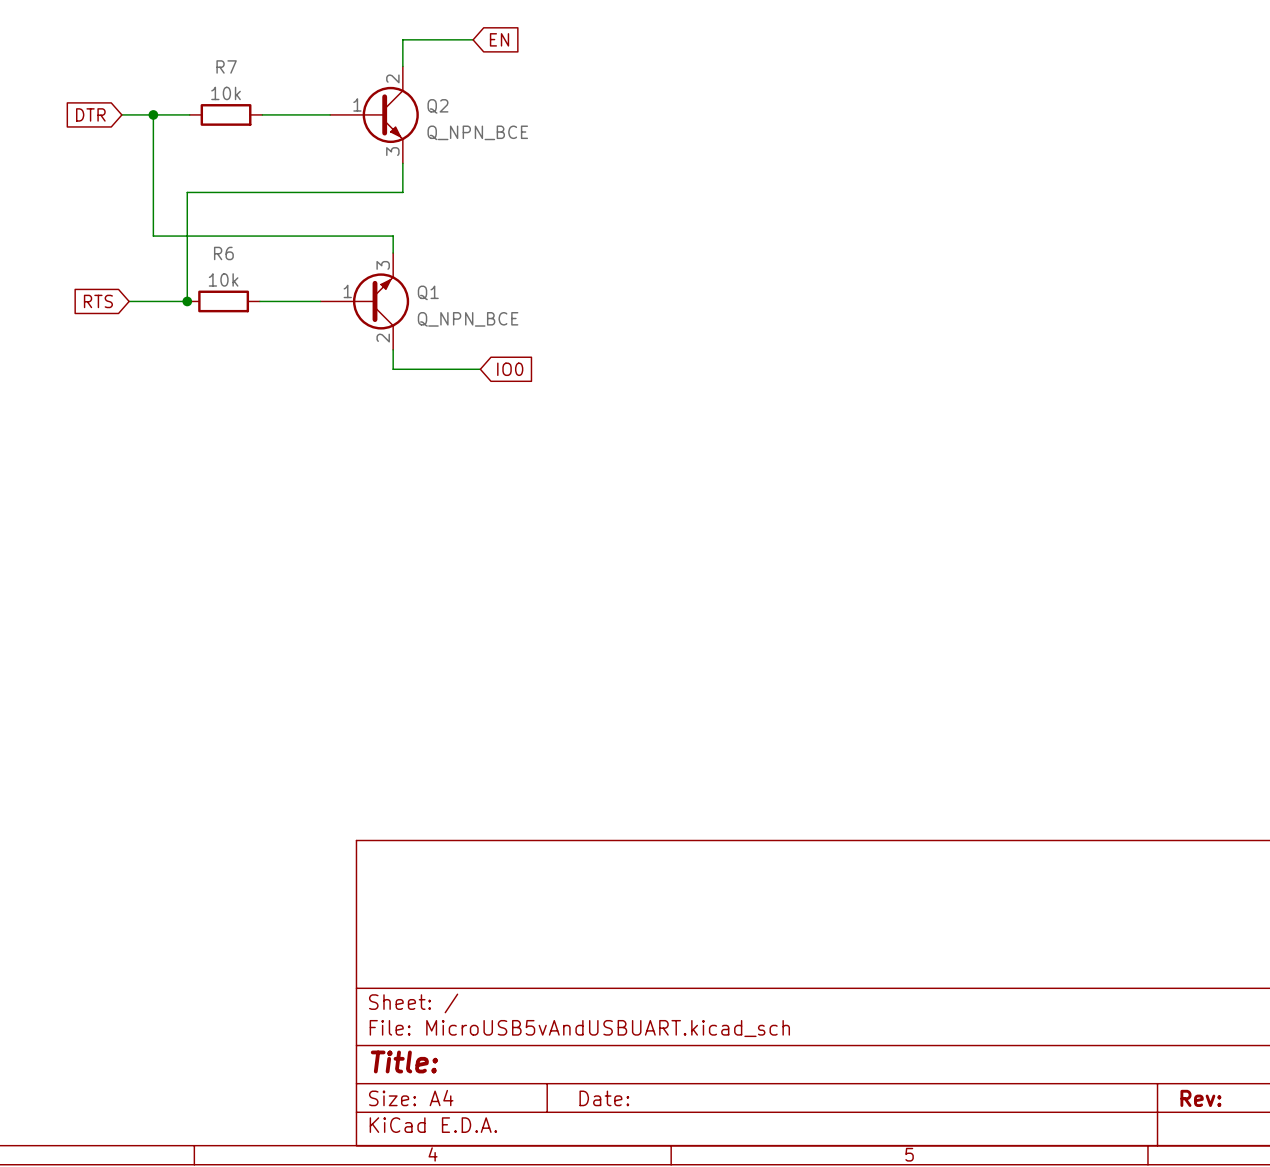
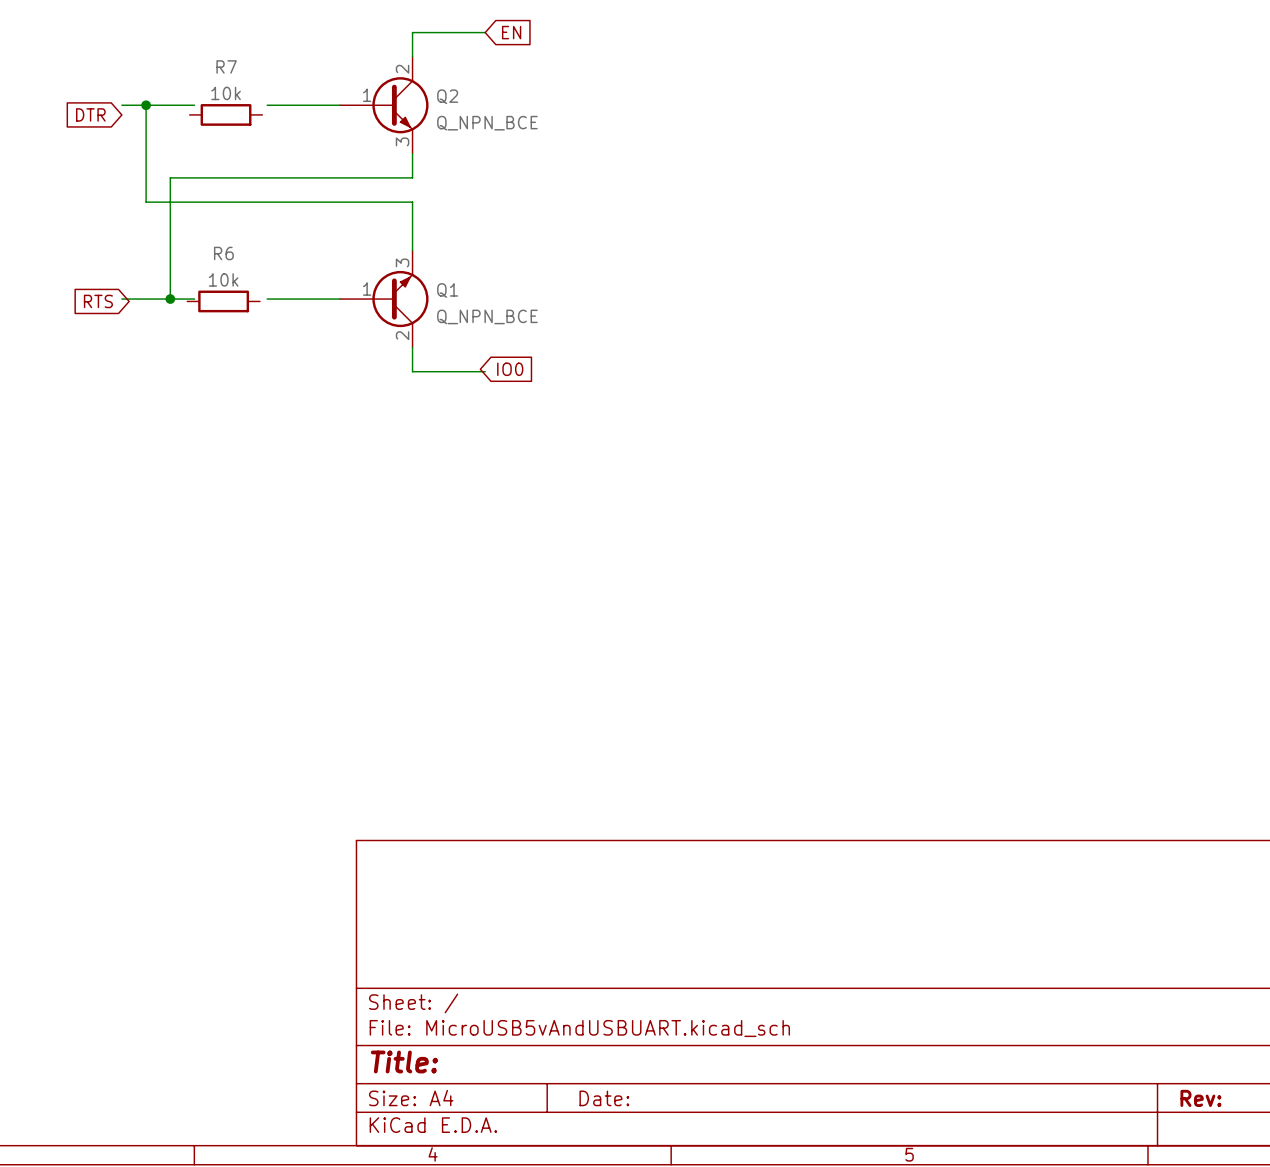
wire: none -> (485, 32) (412, 32) (412, 56)
wire: (473, 39) (402, 39) (402, 66) -> none
global label position: EN (499, 39) -> EN (511, 32)
wire: none -> (121, 105) (194, 105)
wire: none -> (146, 105) (146, 202) (412, 202) (412, 250)
wire: none -> (267, 105) (339, 105)
wire: (121, 114) (189, 114) -> none
wire: (153, 114) (153, 236) (393, 236) (393, 253) -> none
junction position: (153, 114) -> (146, 105)
wire: (262, 114) (330, 114) -> none
Q2 position: (374, 114) -> (384, 105)
wire: none -> (412, 153) (412, 177) (170, 177) (170, 299)
wire: (402, 163) (402, 192) (187, 192) (187, 301) (129, 301) -> none
wire: none -> (121, 299) (194, 299)
wire: none -> (267, 299) (339, 299)
junction position: (187, 301) -> (170, 299)
wire: (259, 301) (320, 301) -> none
Q1 position: (364, 301) -> (384, 299)
wire: none -> (412, 347) (412, 371) (485, 371)
wire: (393, 349) (393, 369) (480, 369) -> none

